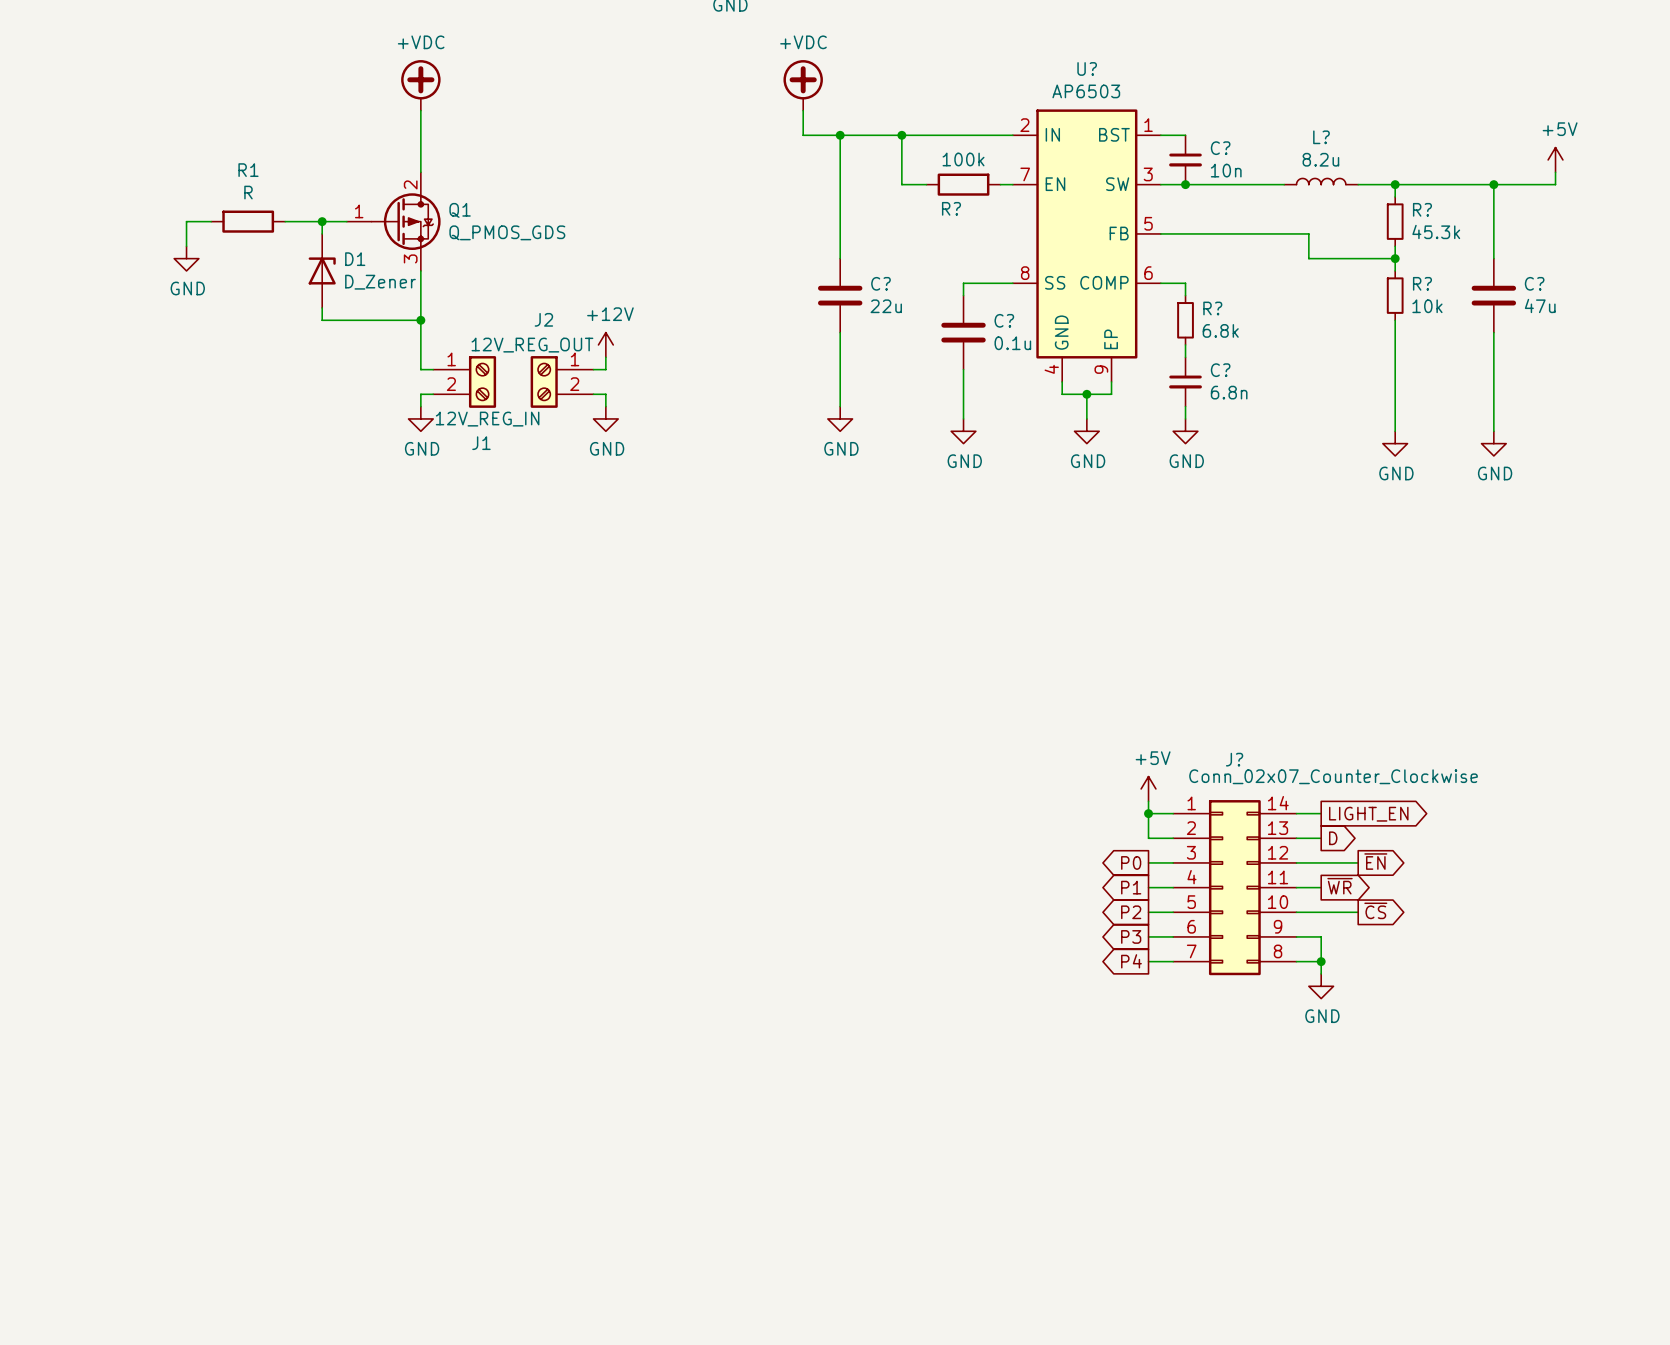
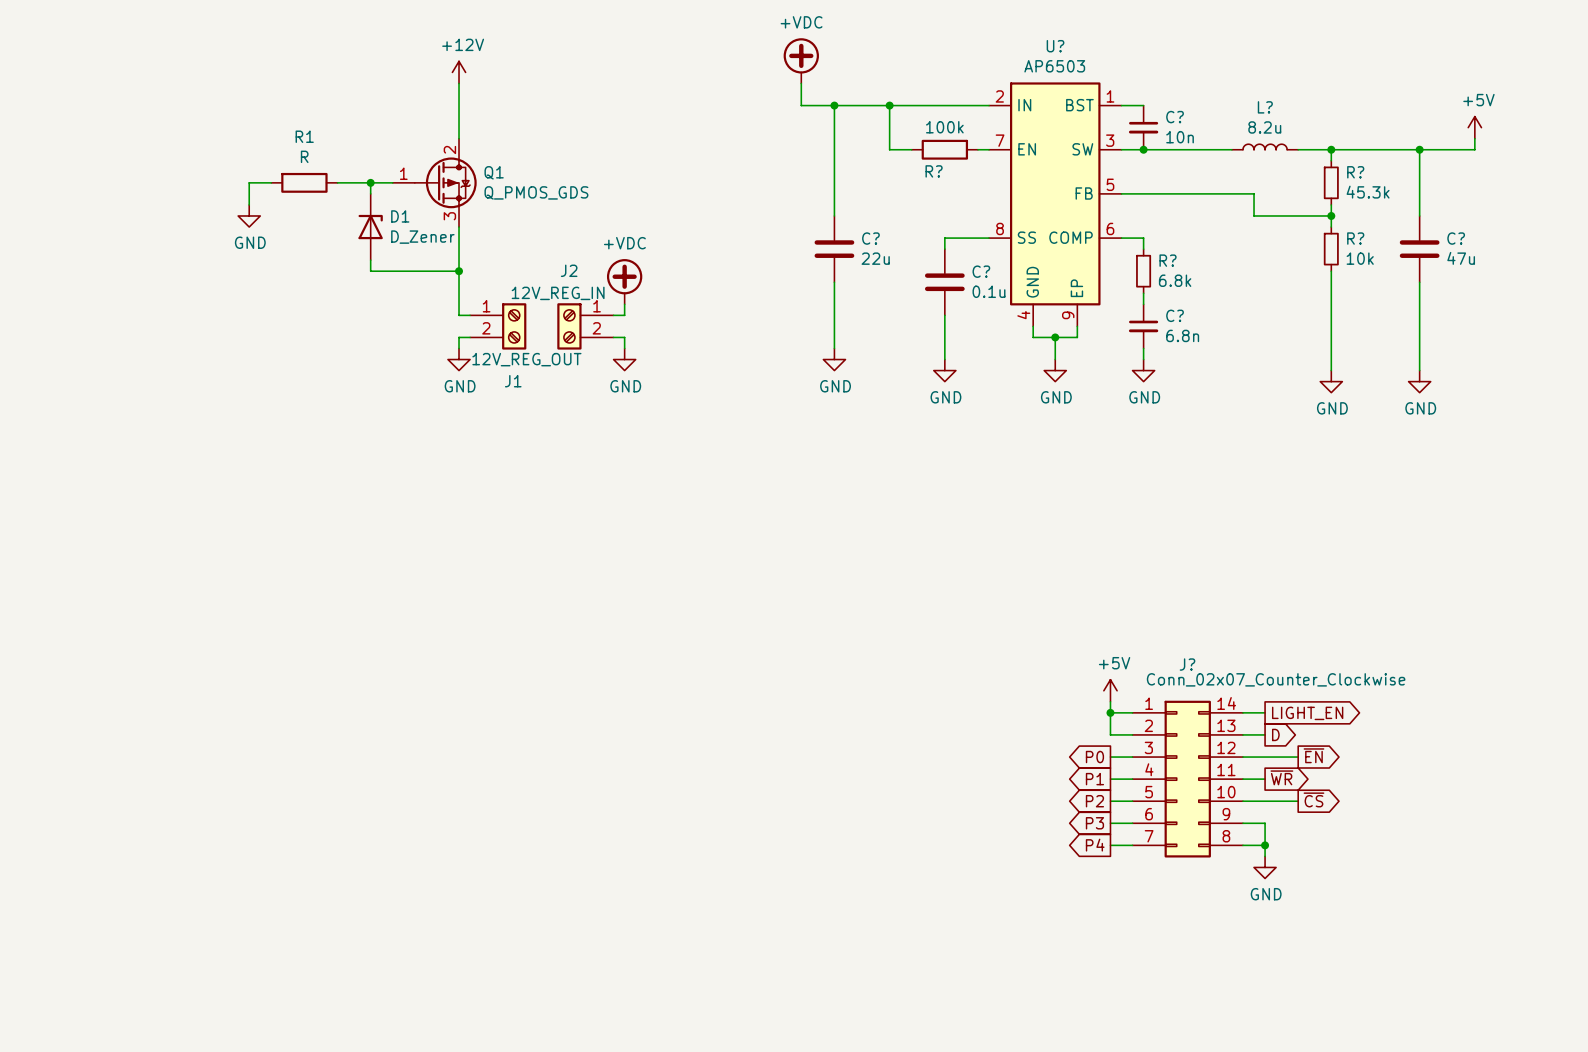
power symbol: +VDC (420, 85) -> none
power symbol: none -> +12V (459, 72)
power symbol: none -> +VDC (624, 281)
power symbol: +12V (605, 344) -> none
J2 value: 12V_REG_OUT (532, 345) -> 12V_REG_IN (558, 293)
J1 value: 12V_REG_IN (487, 419) -> 12V_REG_OUT (526, 359)

